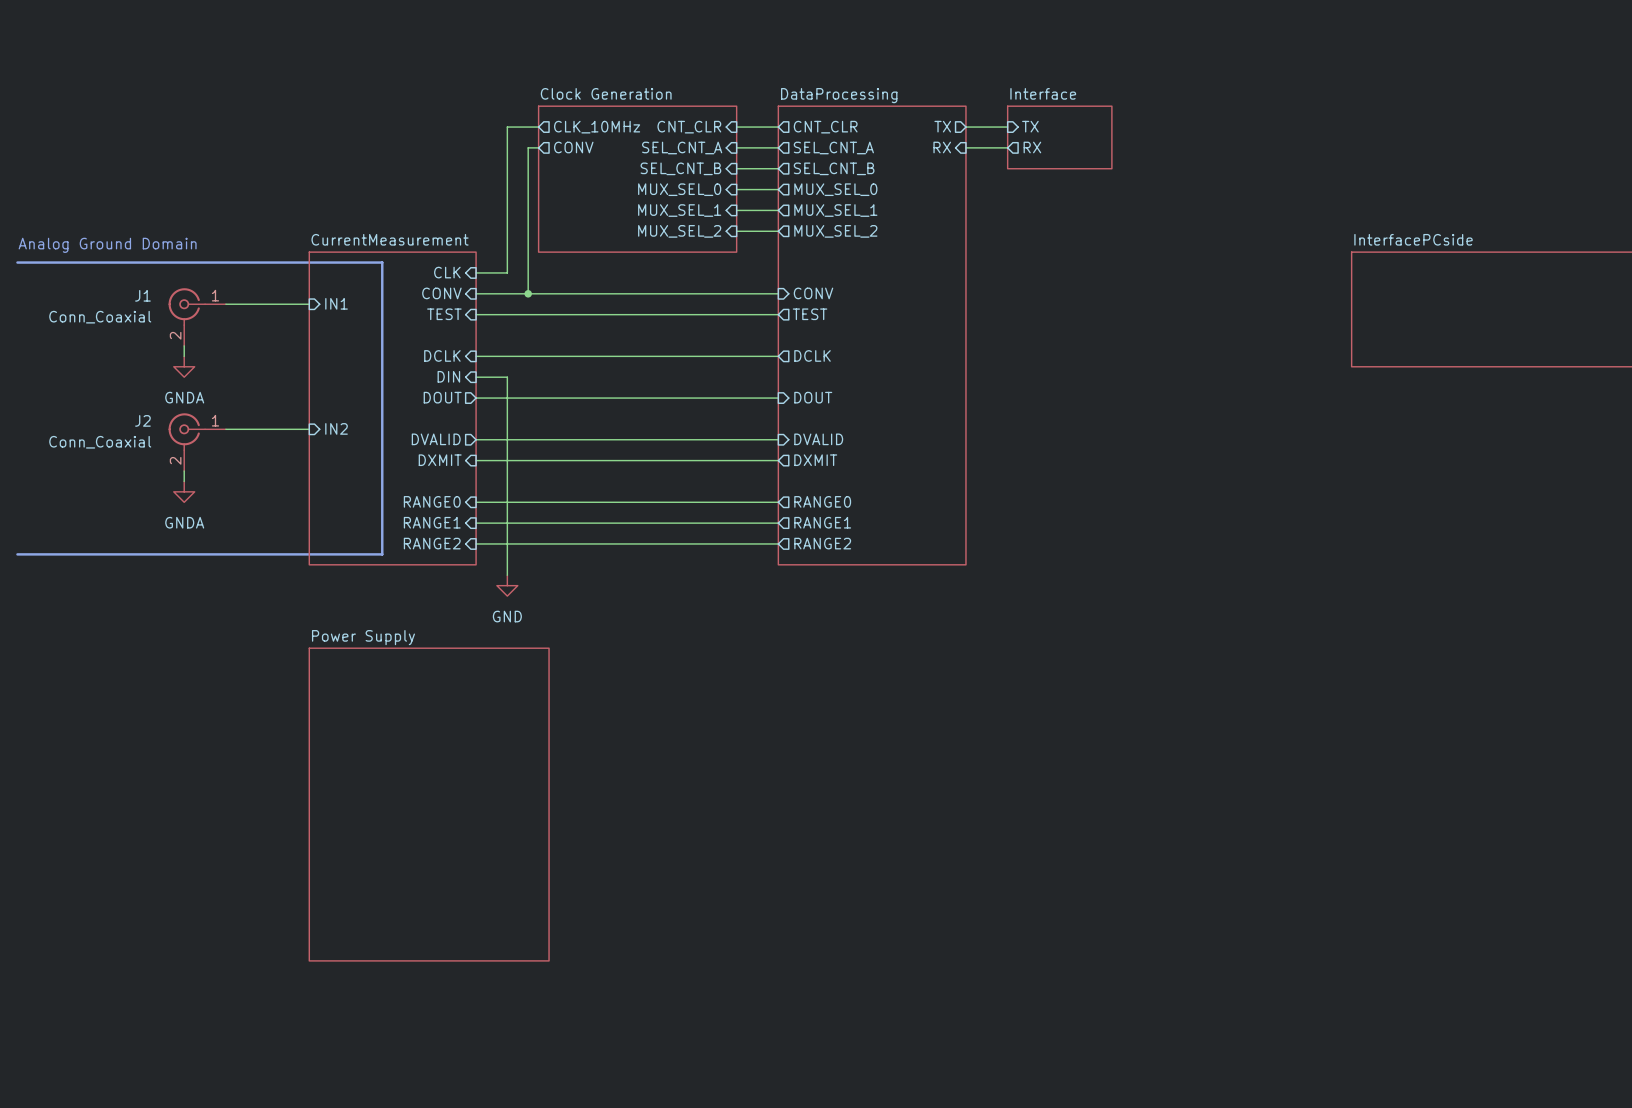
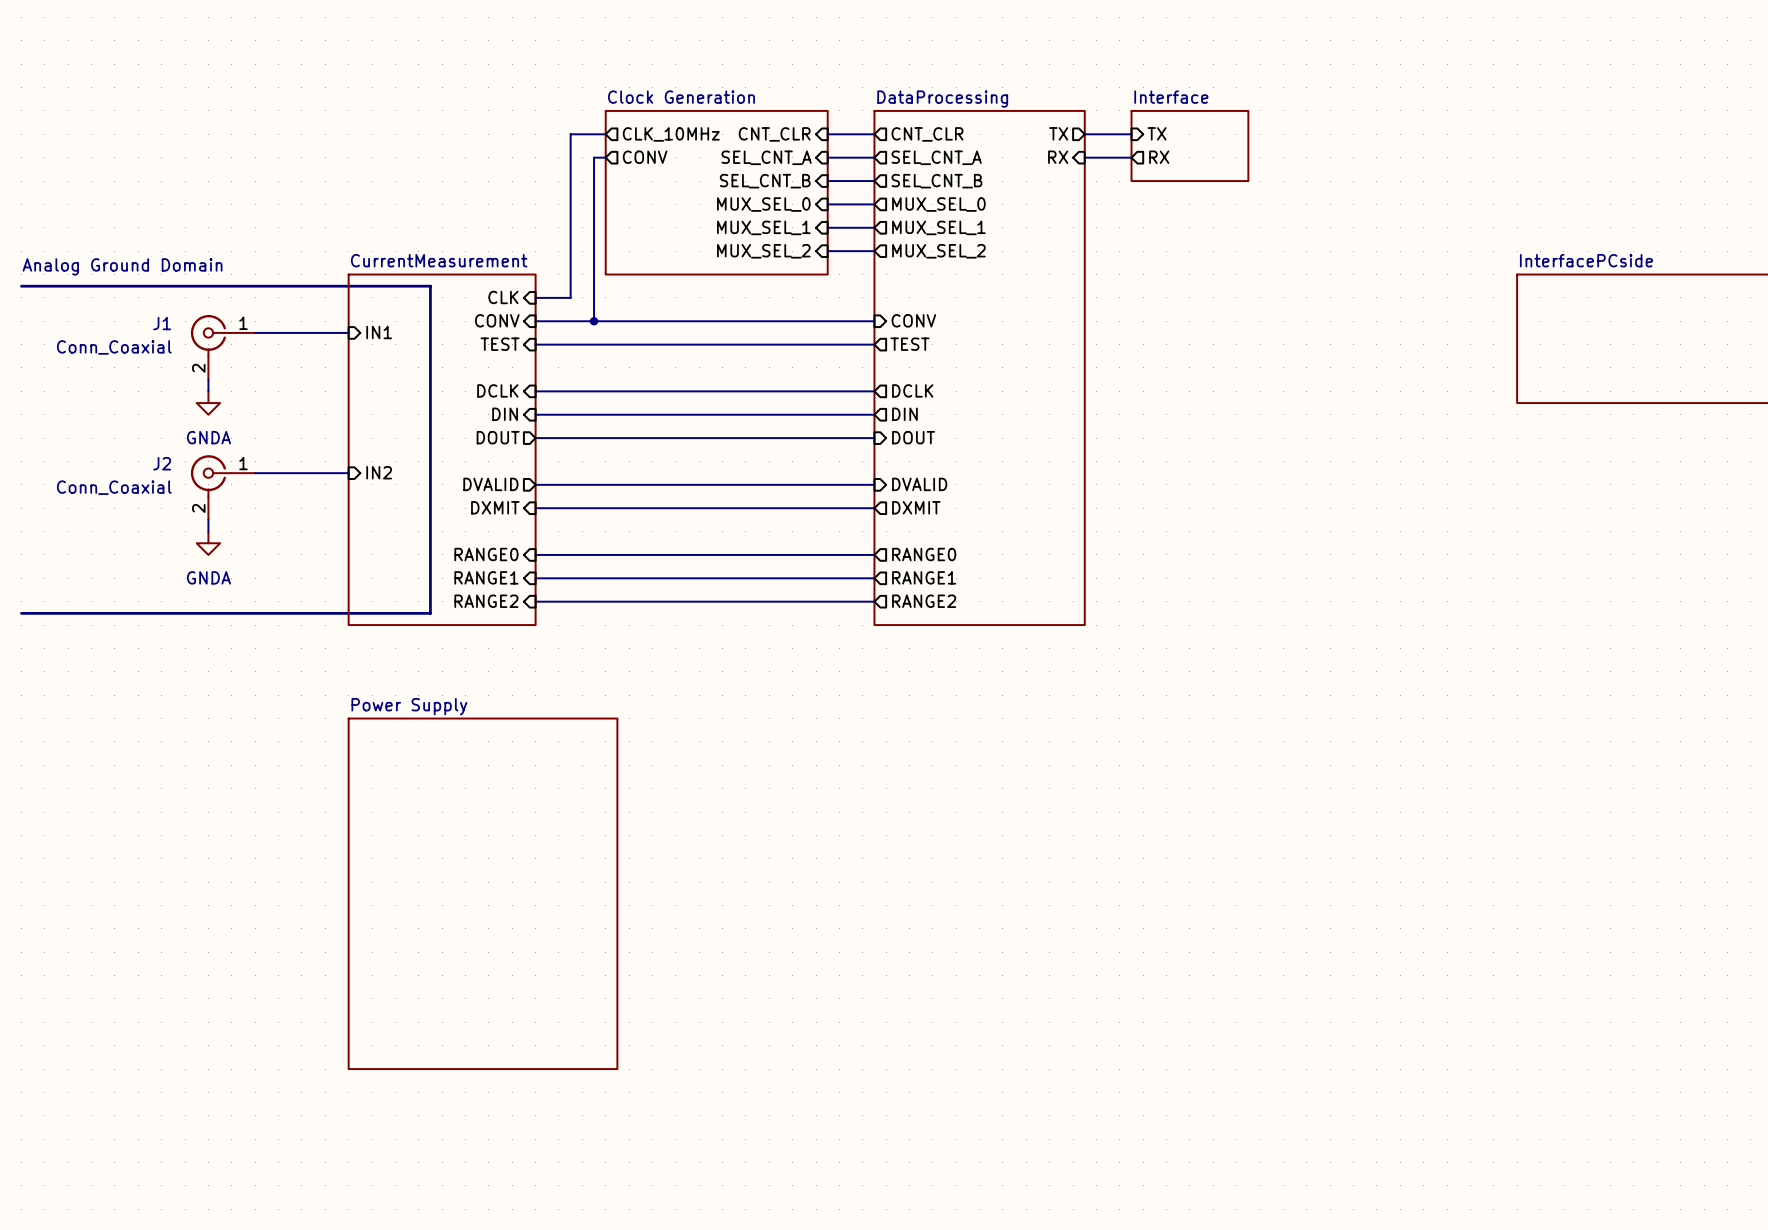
sheet pin: none -> DIN (904, 414)
wire: (507, 377) (507, 575) -> (570, 414) (874, 414)
power symbol: GND (507, 585) -> none

